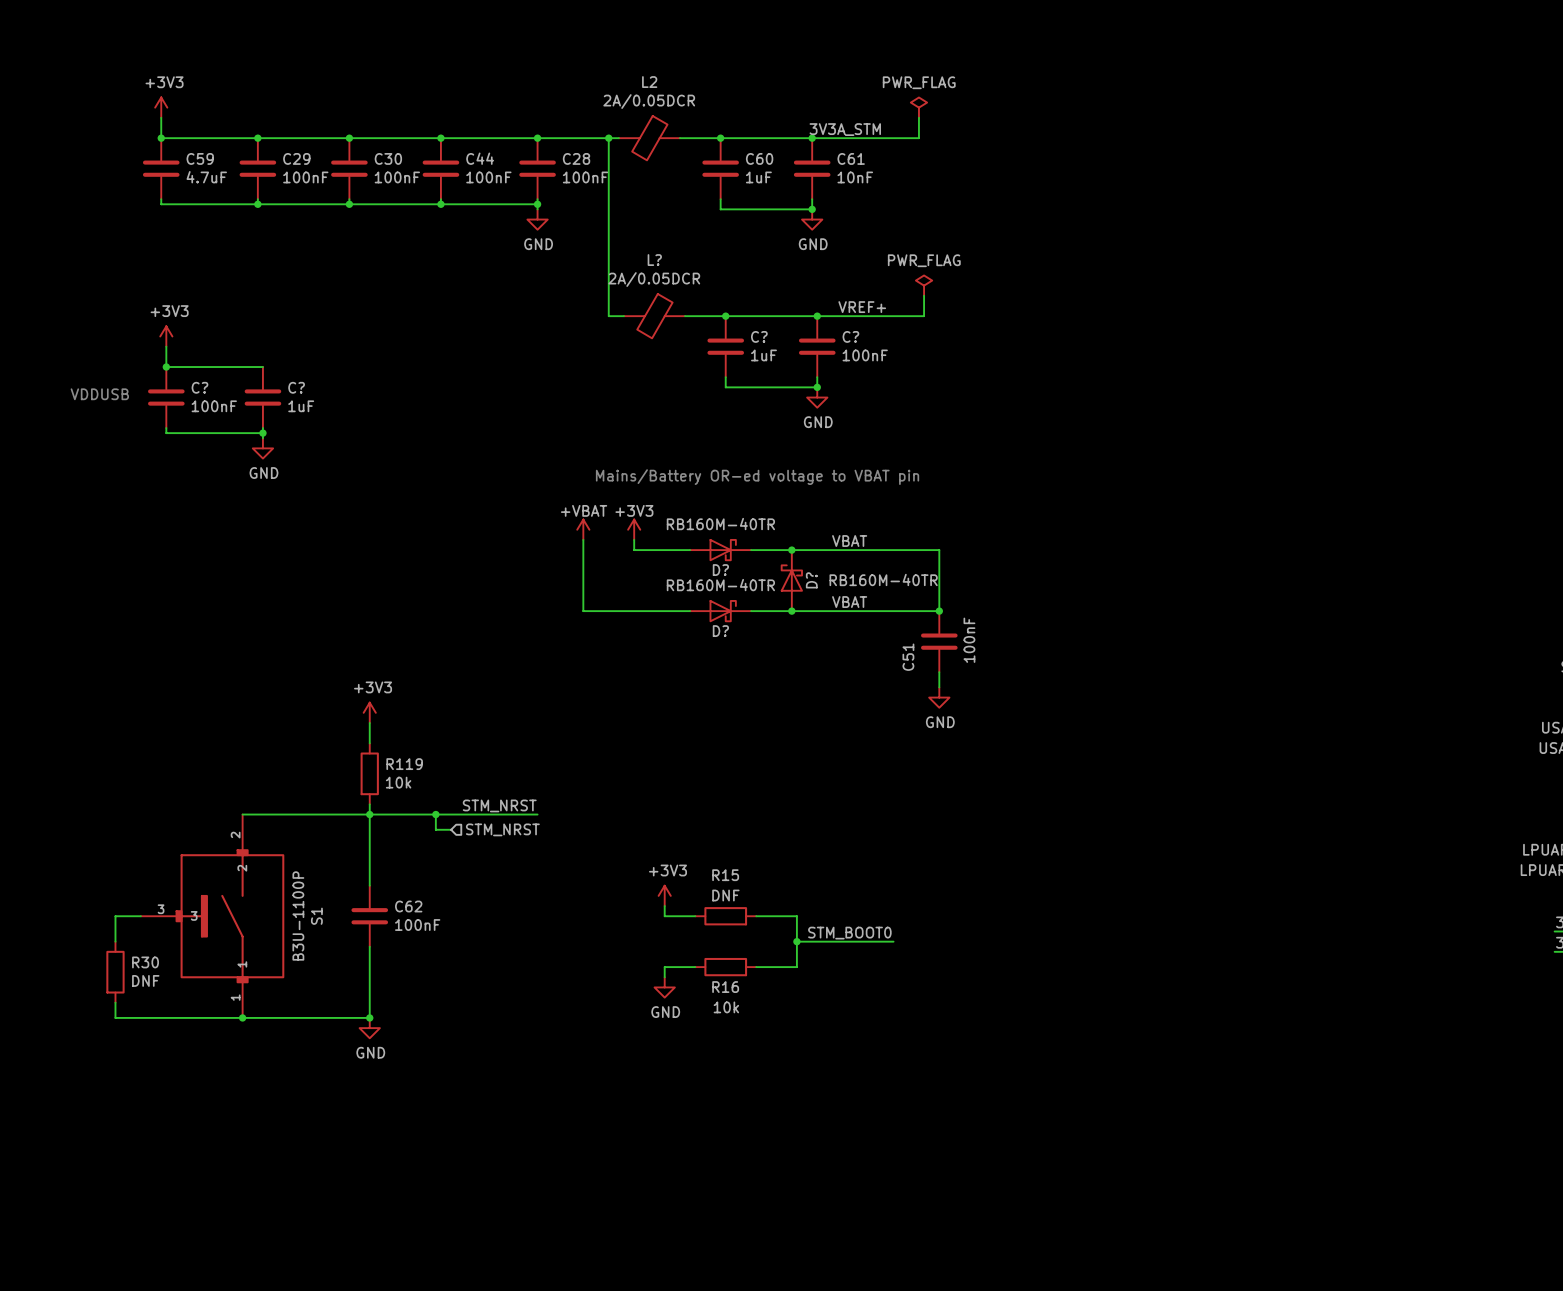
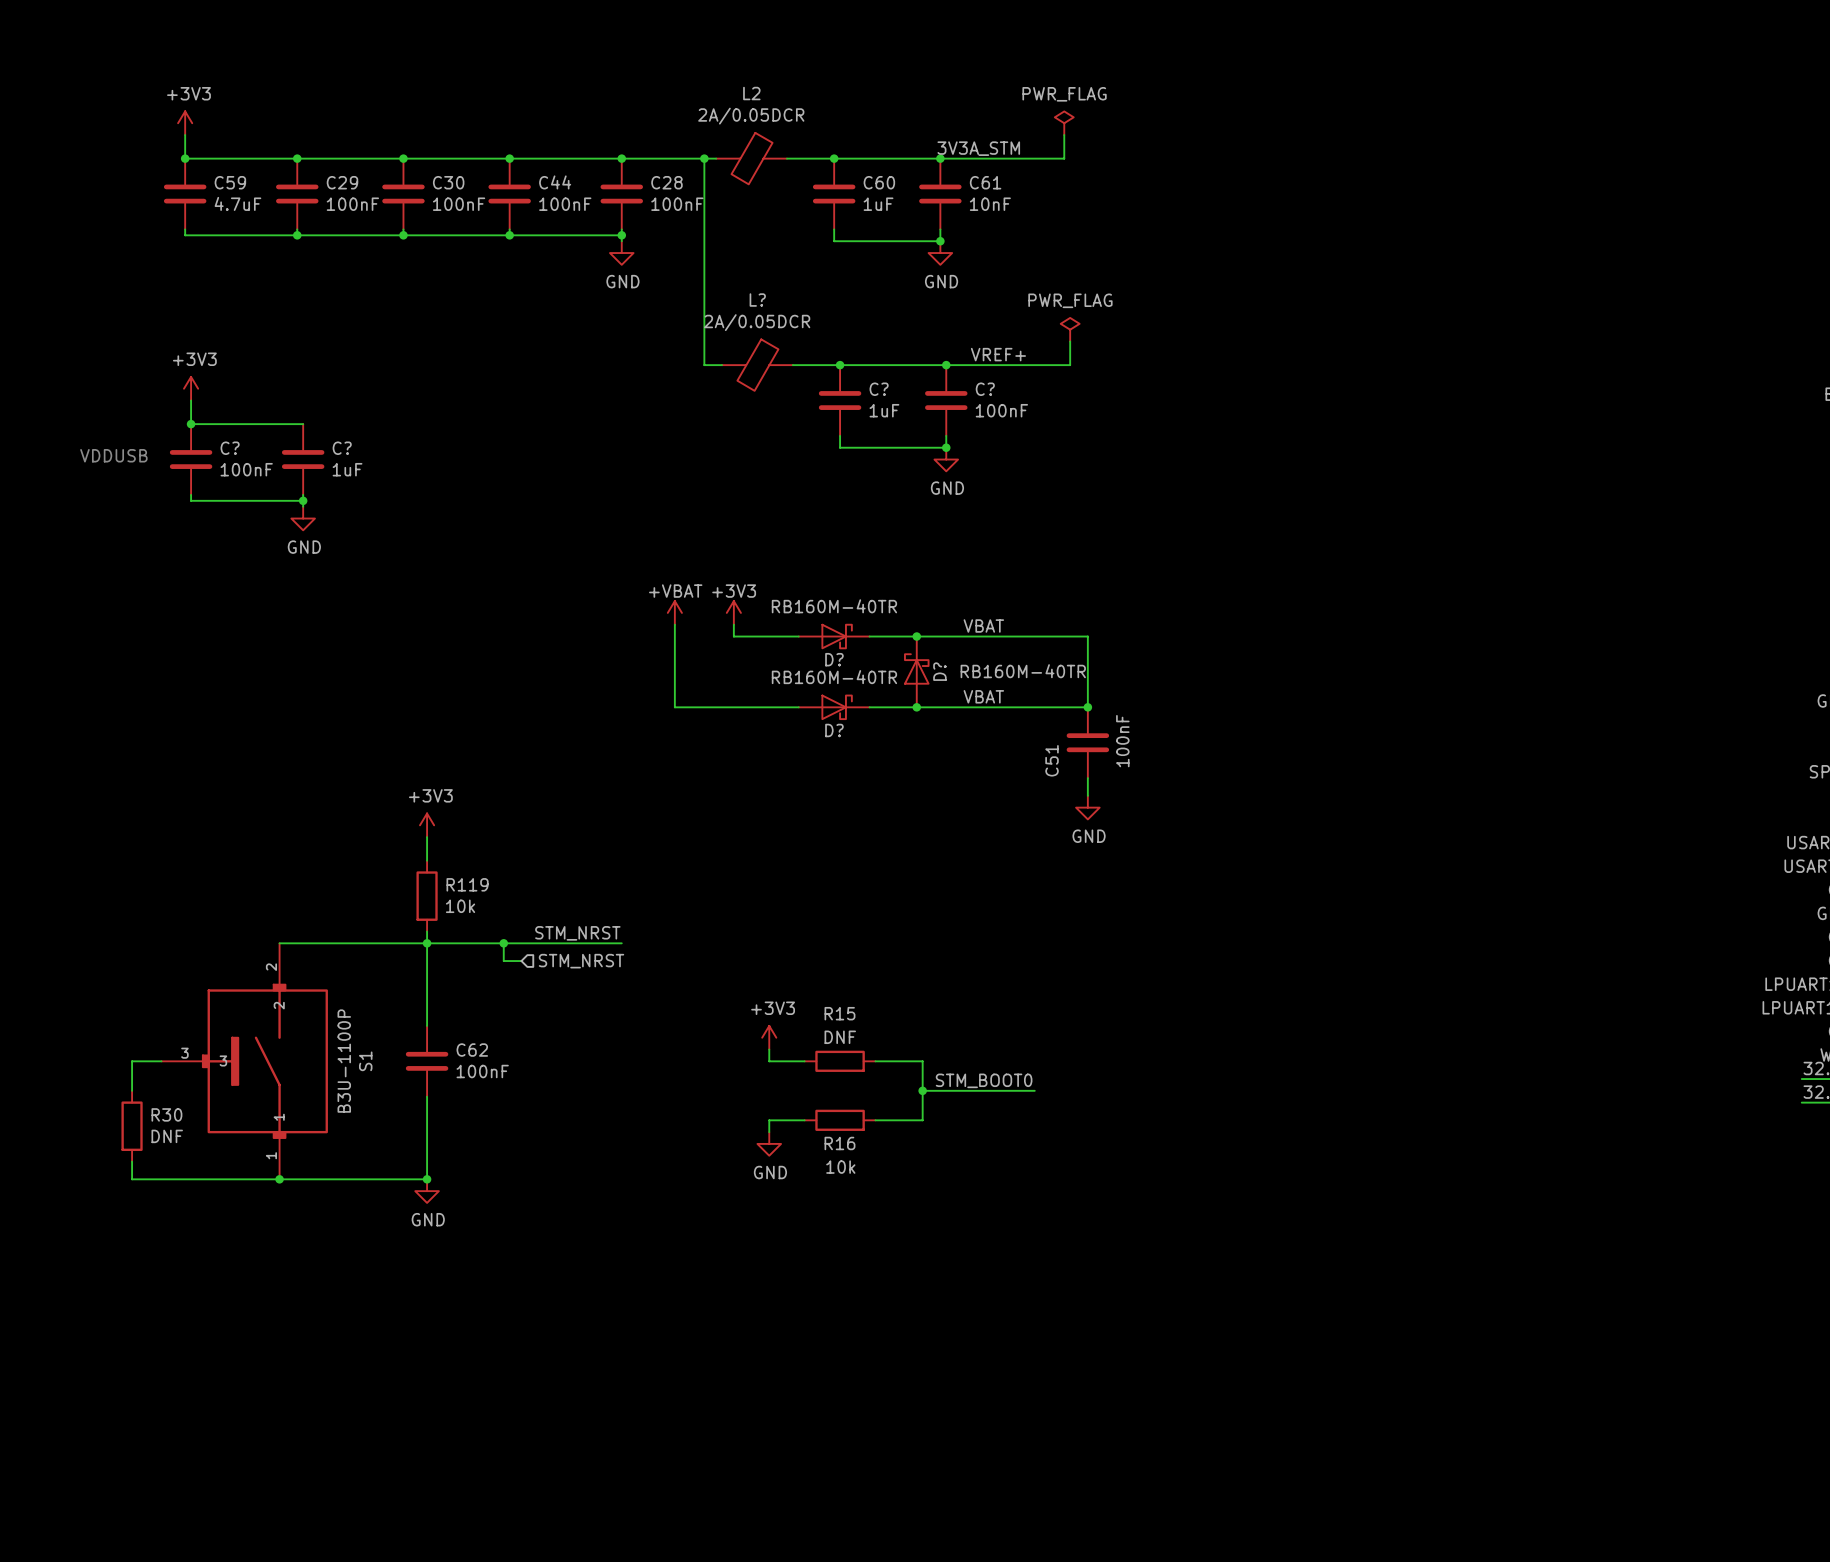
text: Mains/Battery OR-ed voltage to VBAT pin (757, 477) -> none

